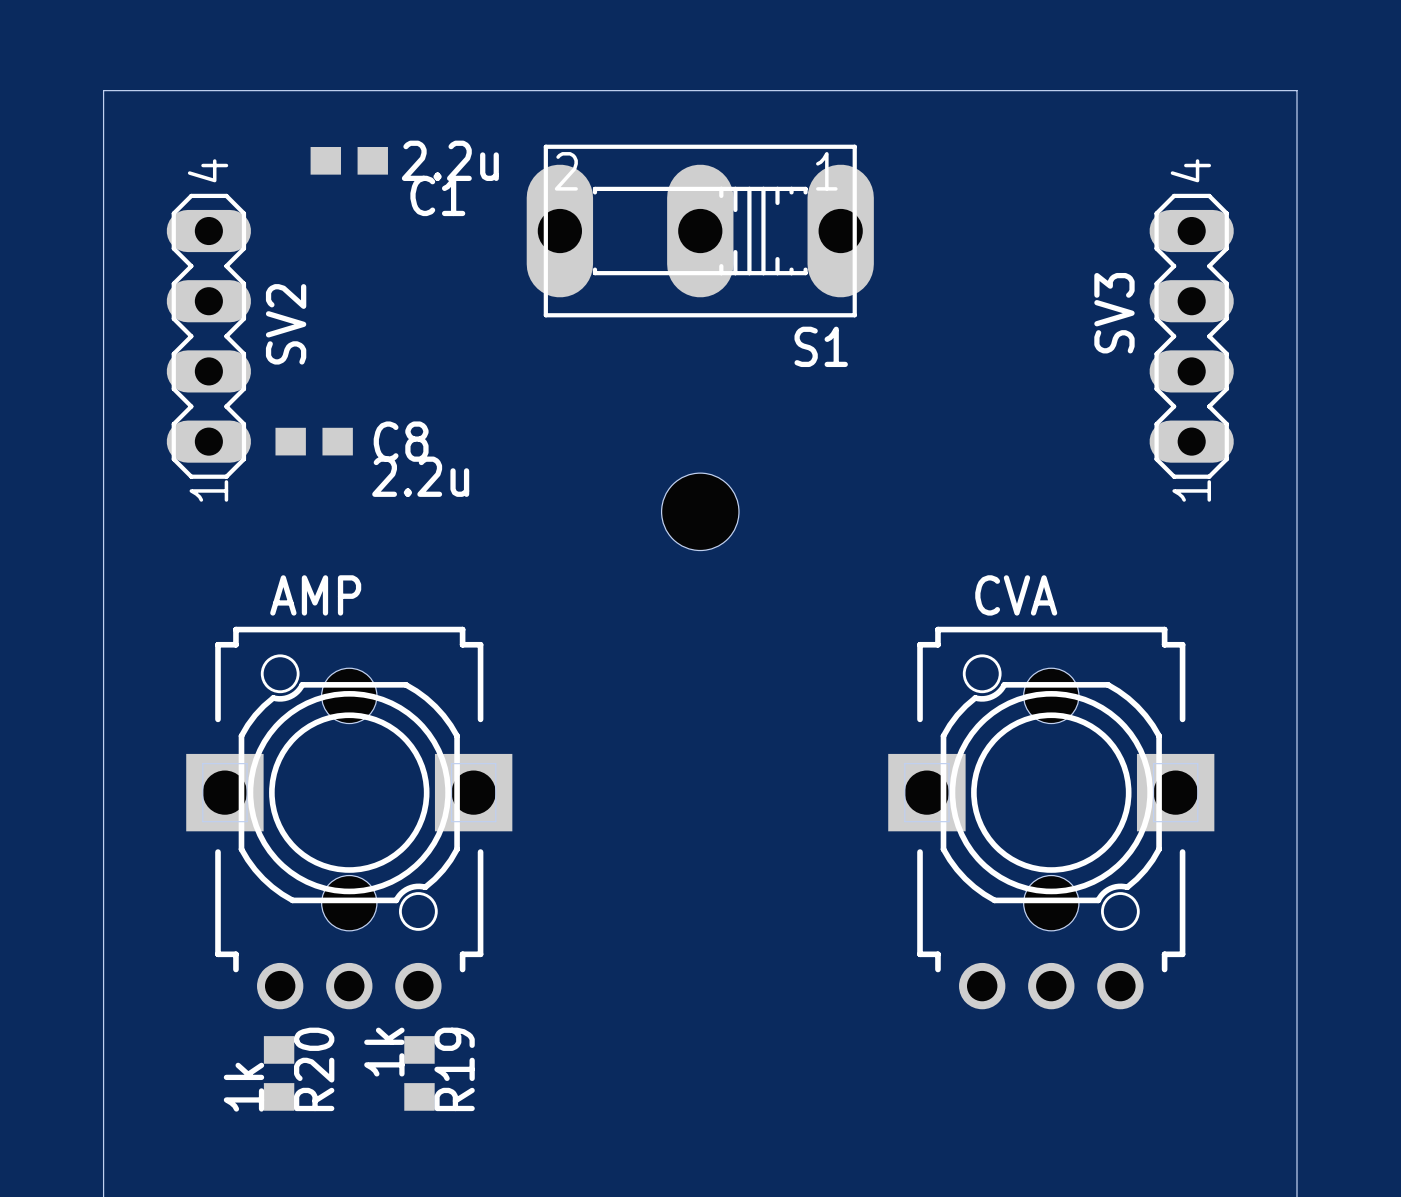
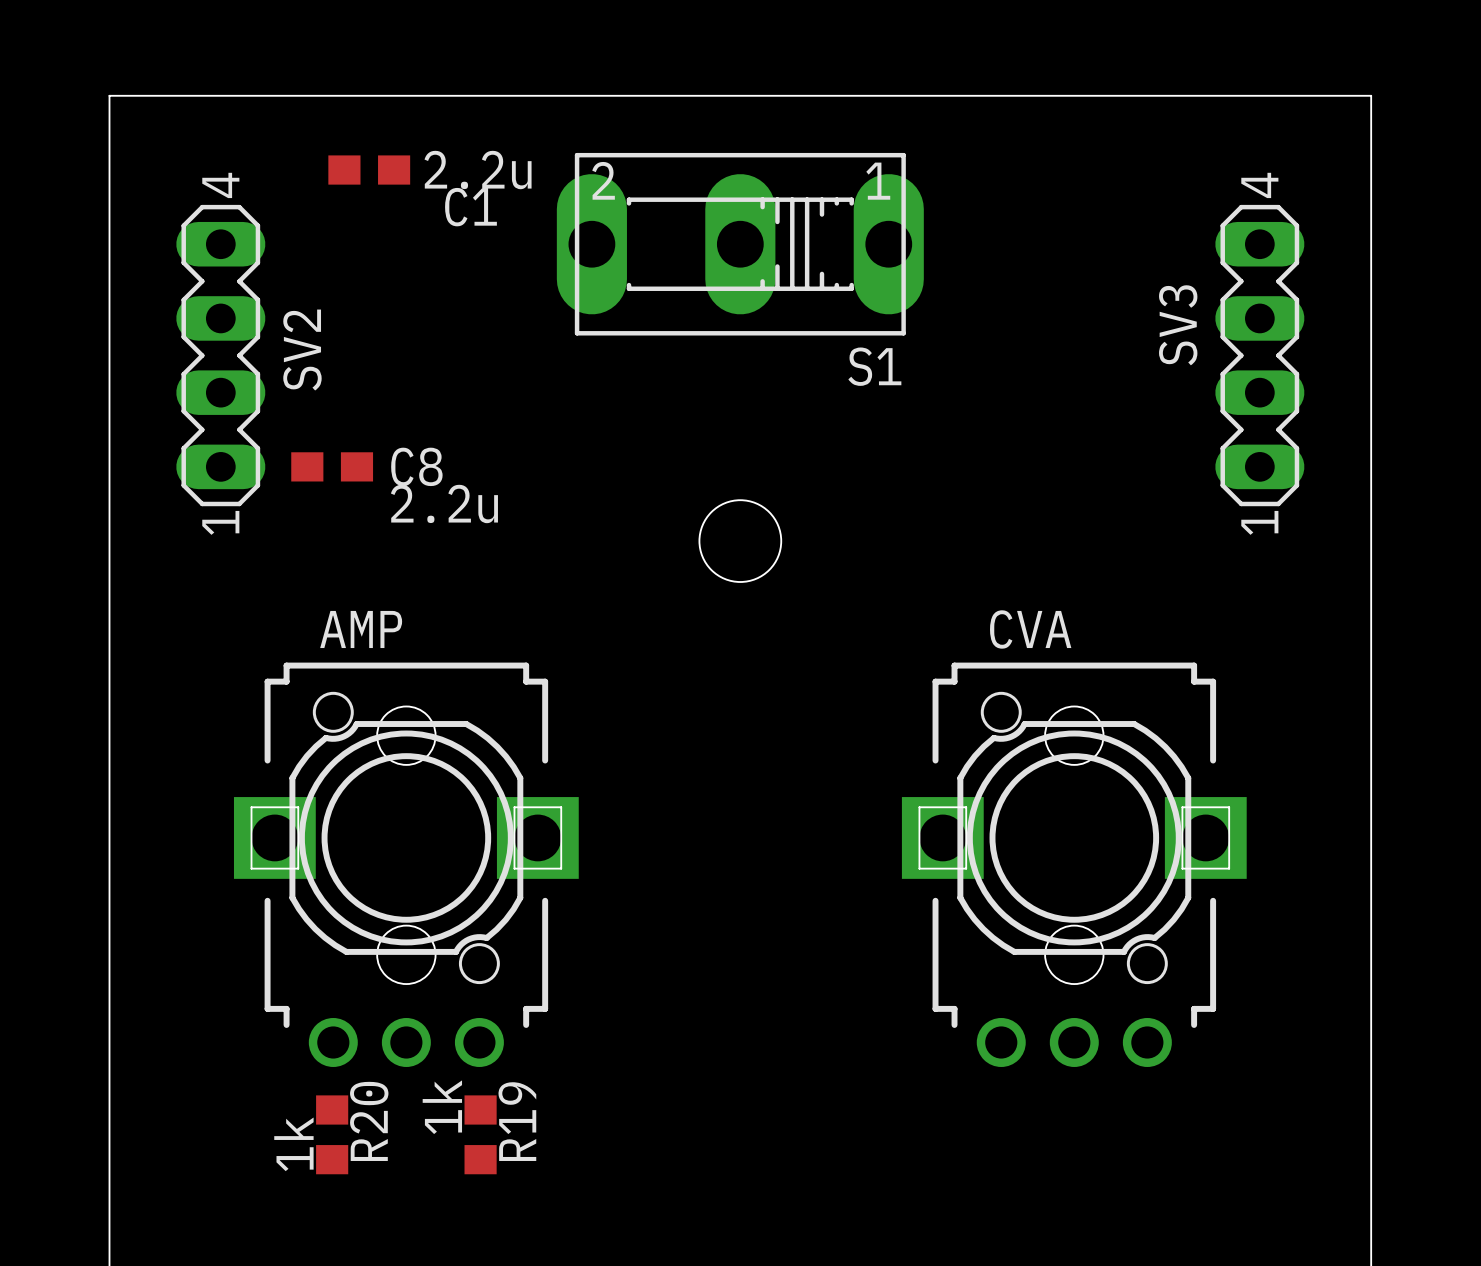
AMP position: (349, 818) -> (406, 864)
CVA position: (1051, 818) -> (1074, 864)
R20 position: (279, 1073) -> (332, 1134)
R19 position: (419, 1073) -> (480, 1134)

